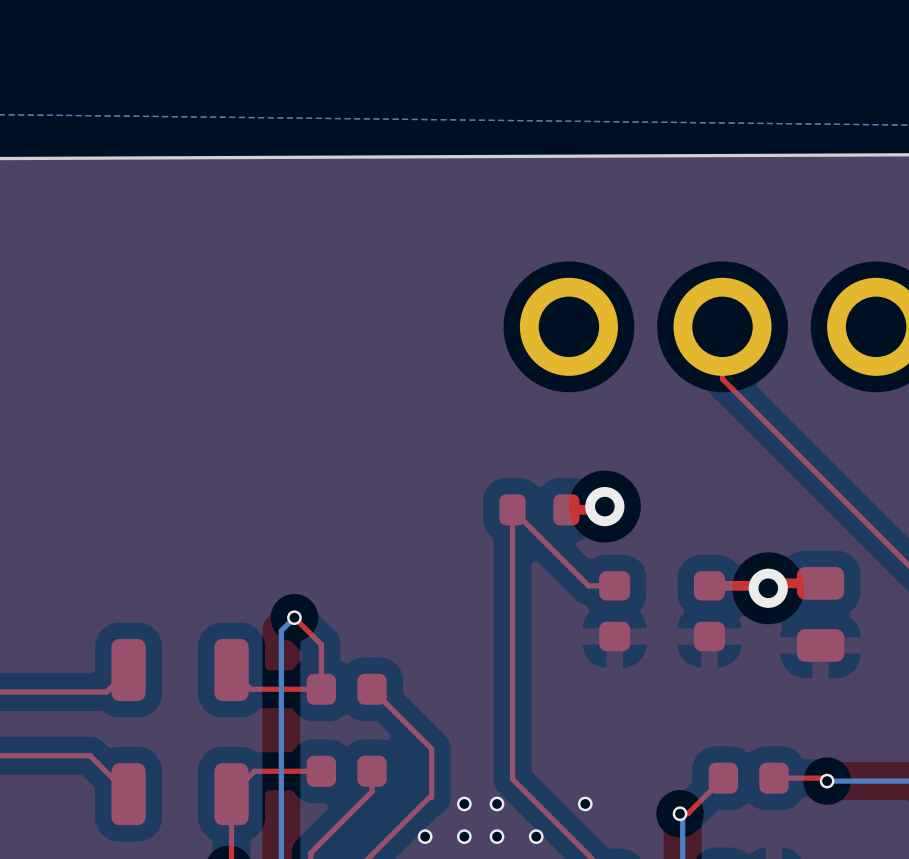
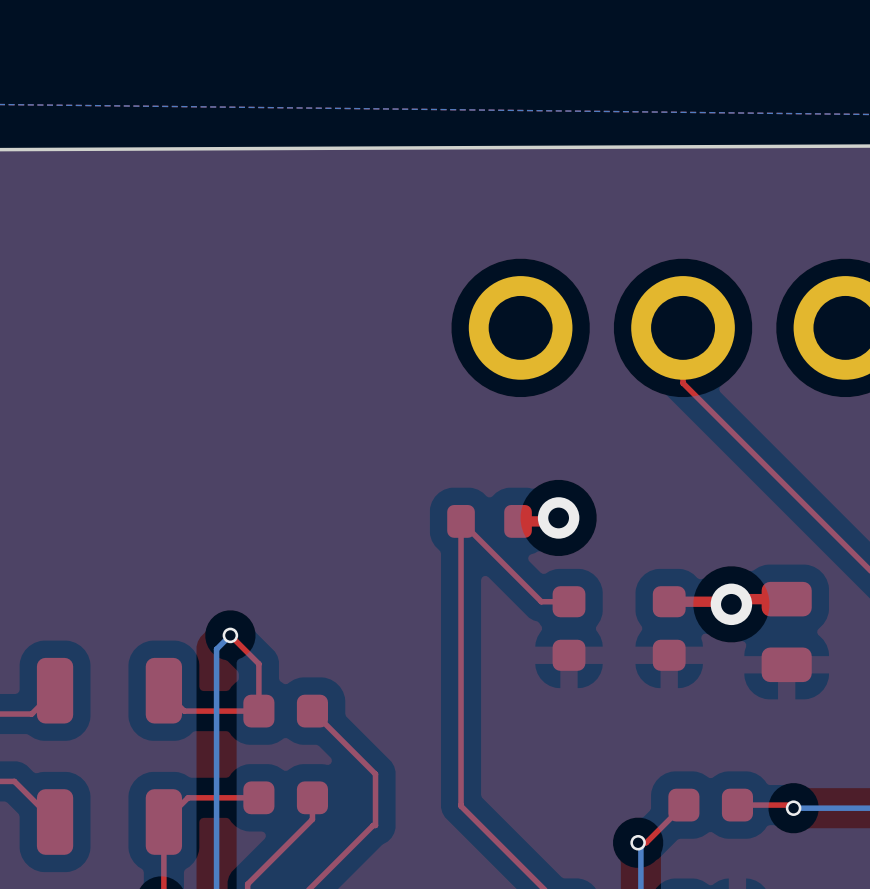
via: (464, 803) -> none
via: (497, 803) -> none
via: (585, 803) -> none
via: (425, 836) -> none
via: (464, 836) -> none
via: (497, 836) -> none
via: (536, 836) -> none

